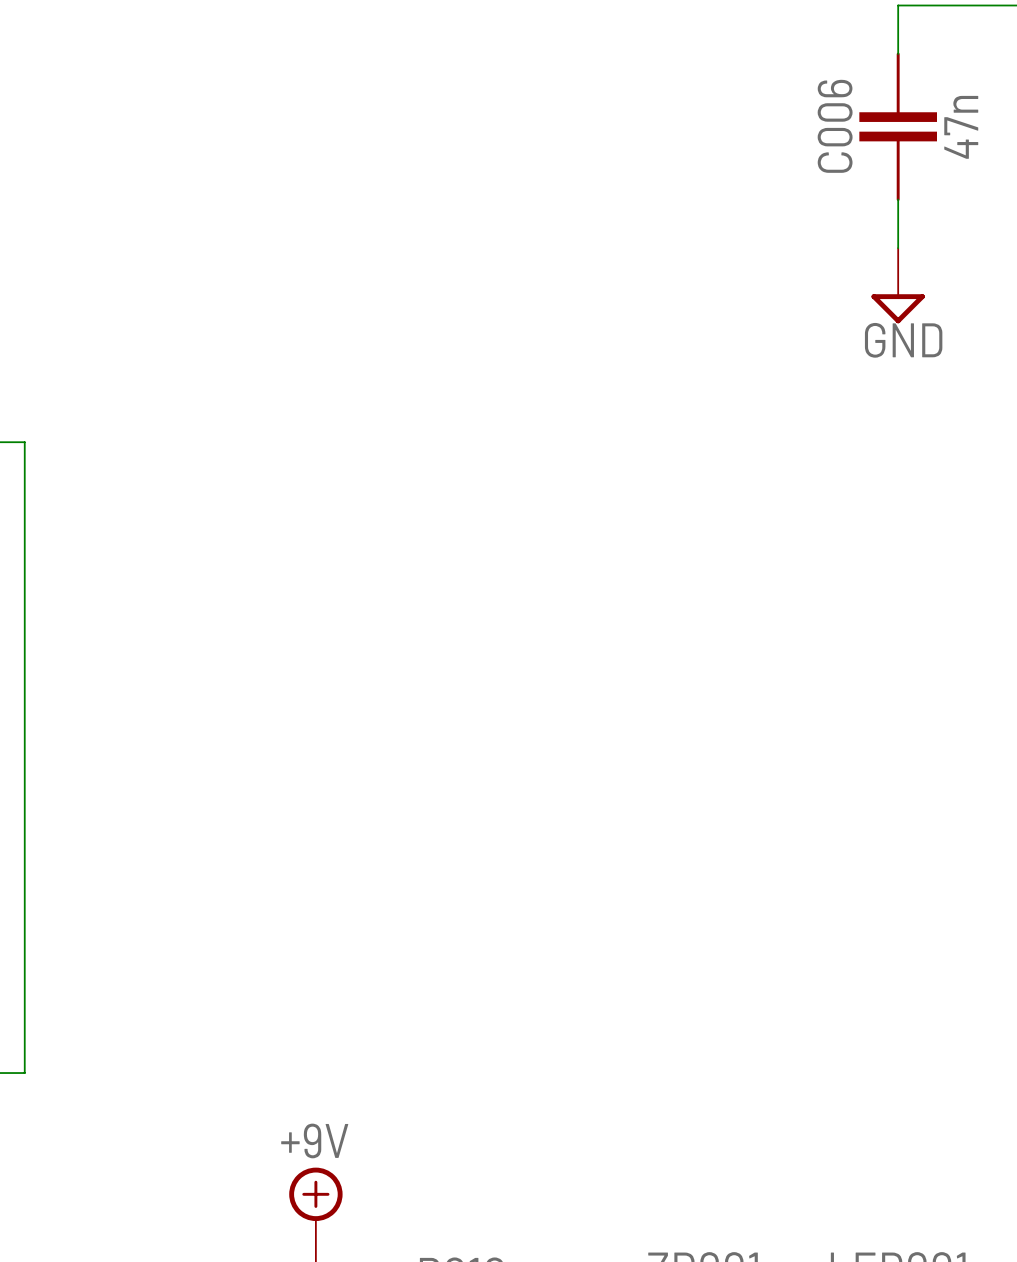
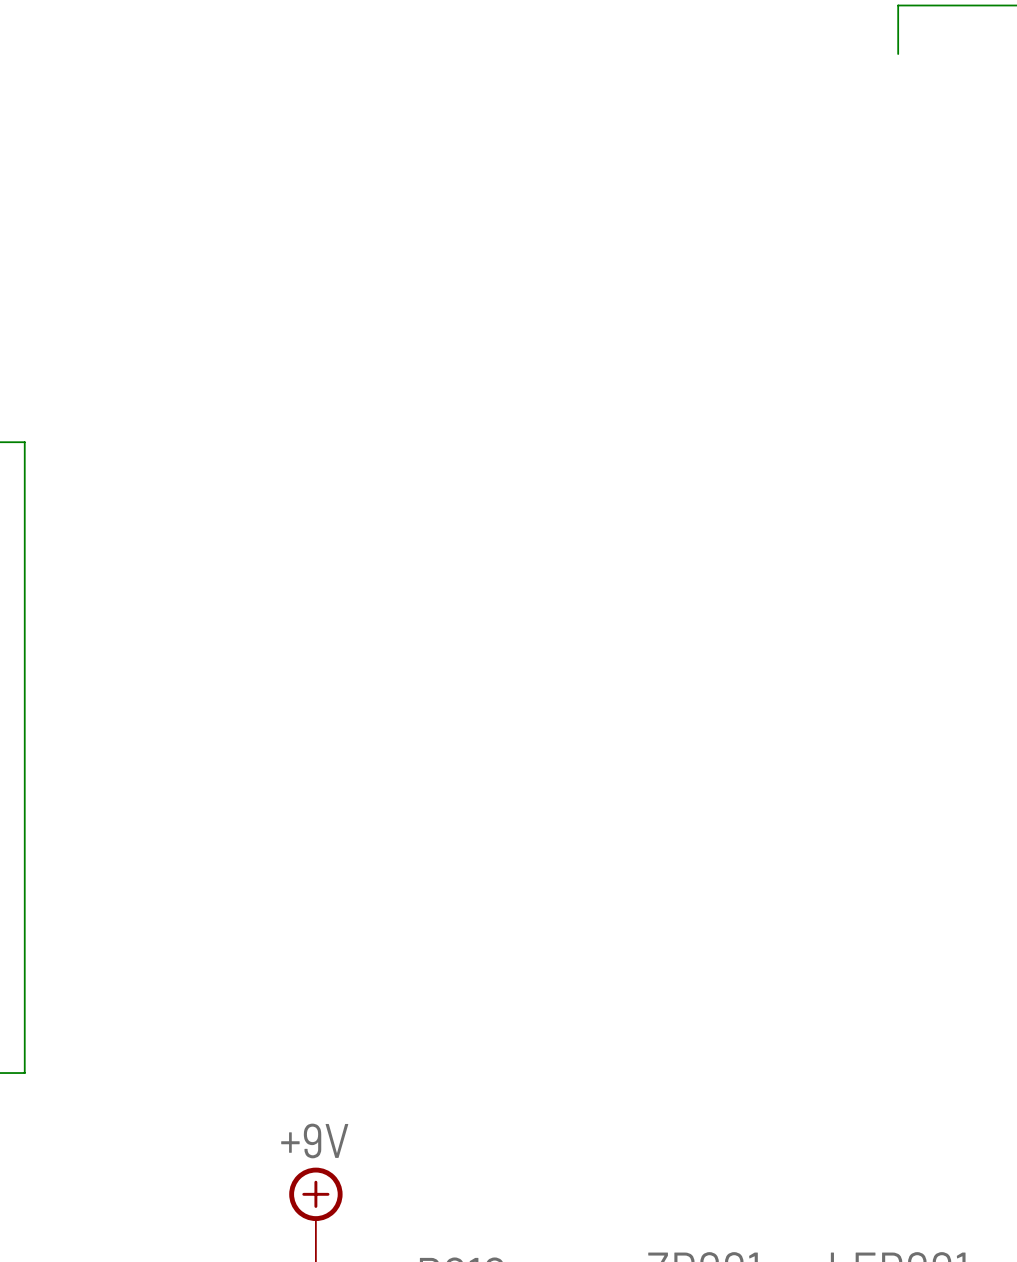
C006: 47n (898, 126) -> none
wire: (898, 199) (898, 248) -> none
power symbol: GND (898, 285) -> none

